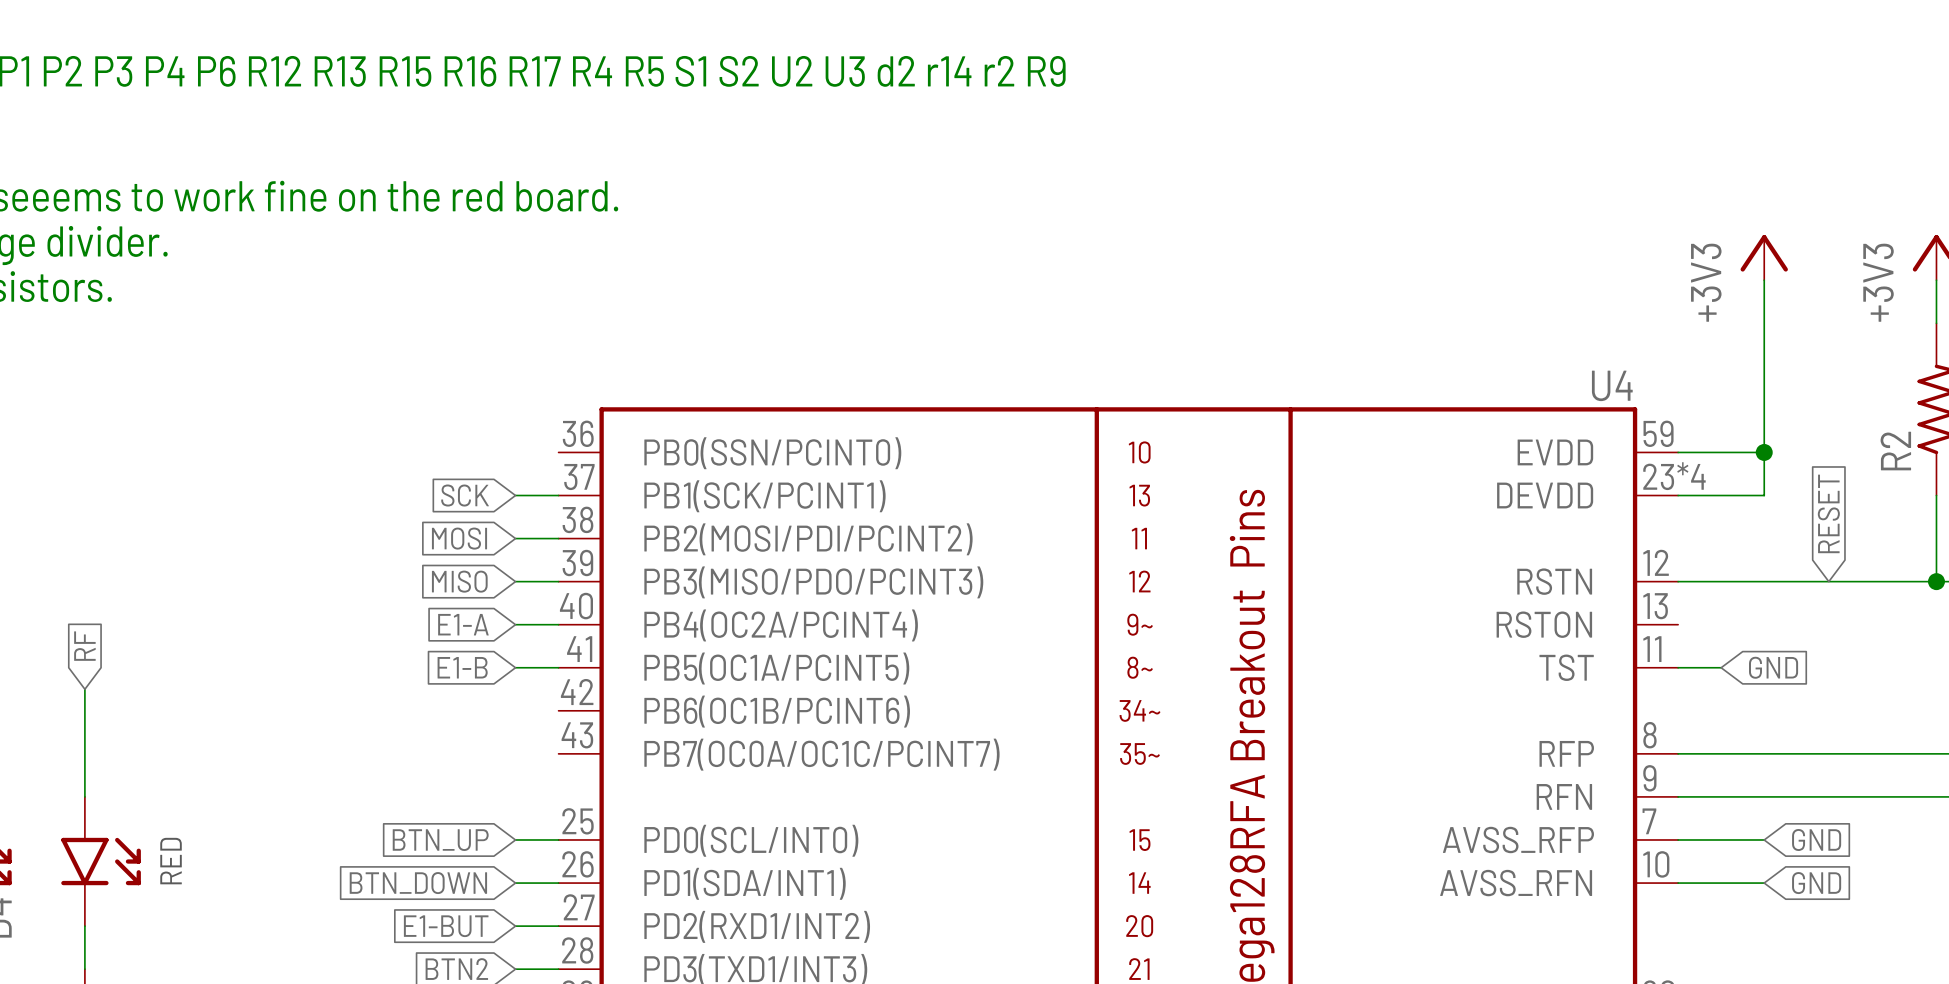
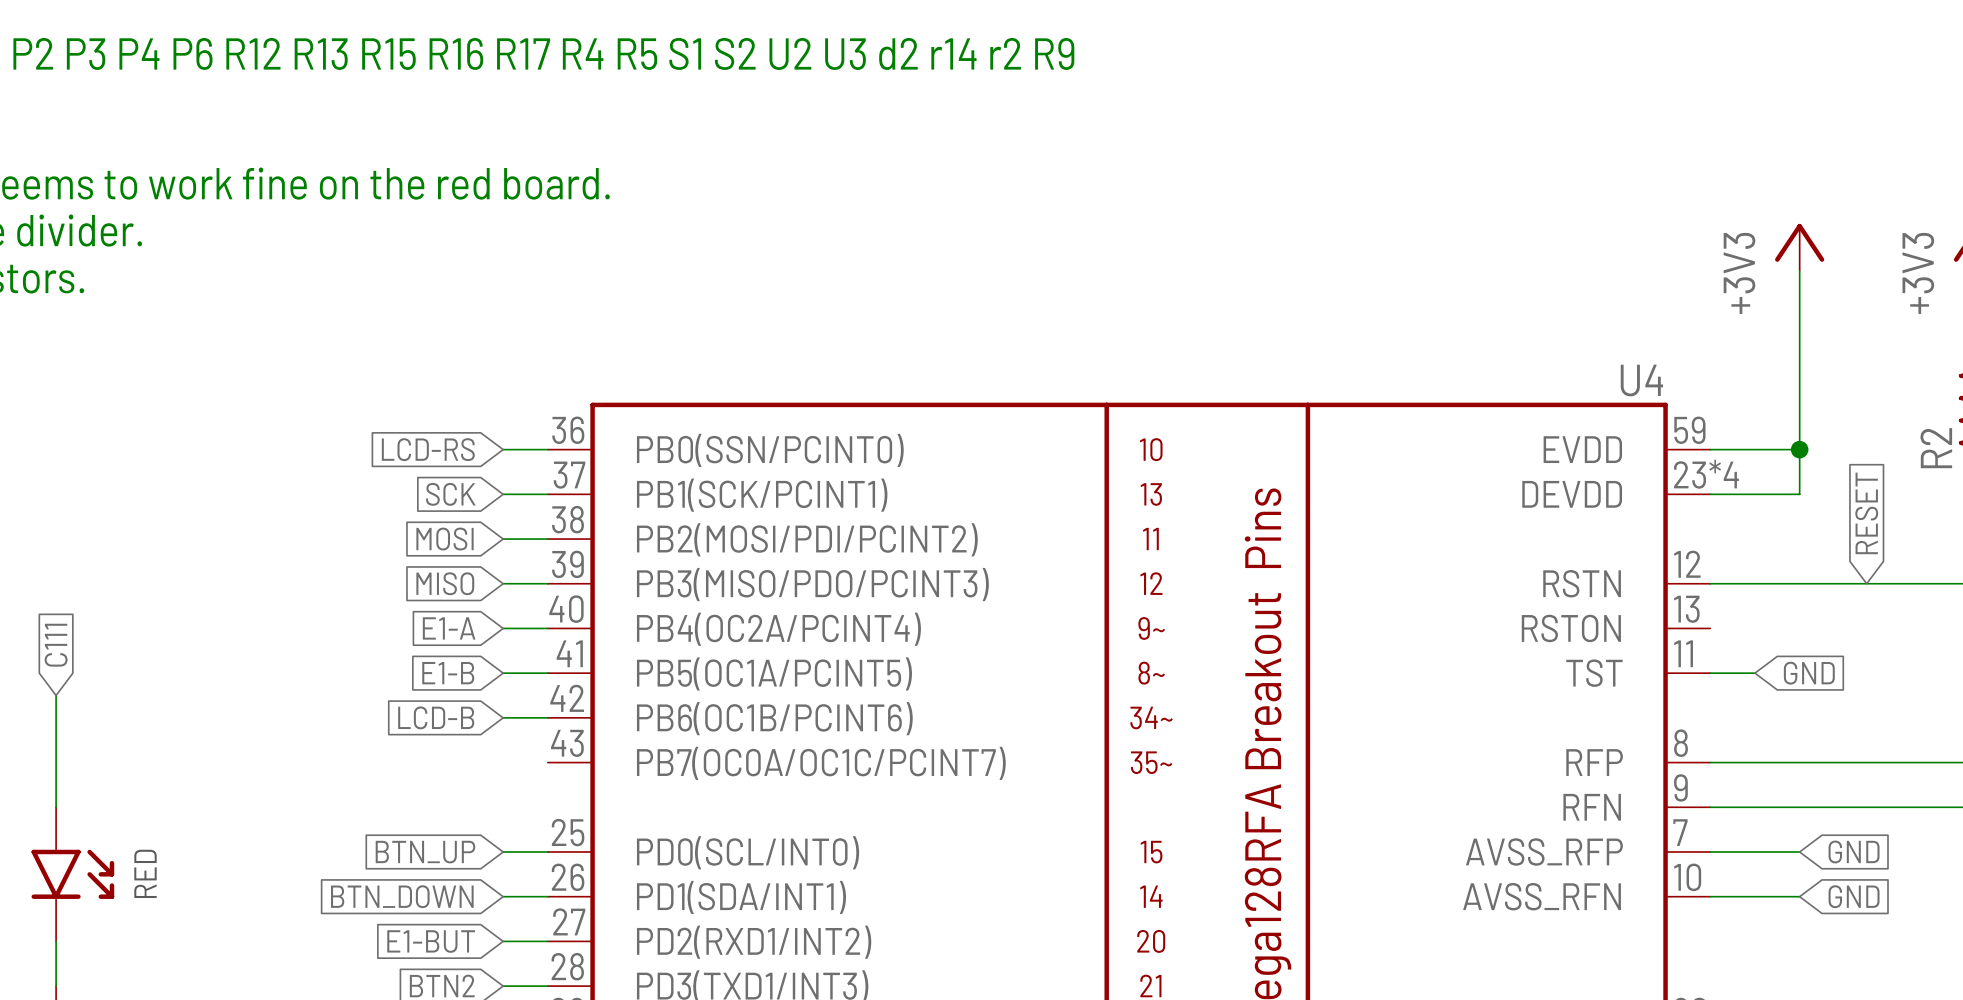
global label: none -> LCD-RS (428, 449)
wire: none -> (503, 449) (547, 449)
global label: RF (84, 646) -> C111 (56, 645)
global label: none -> LCD-B (436, 717)
wire: none -> (503, 717) (547, 717)

